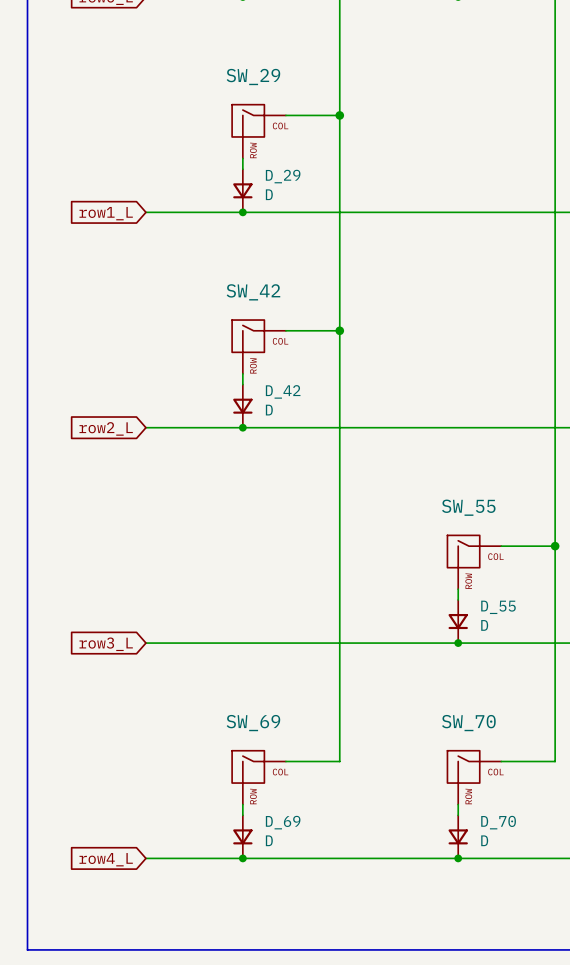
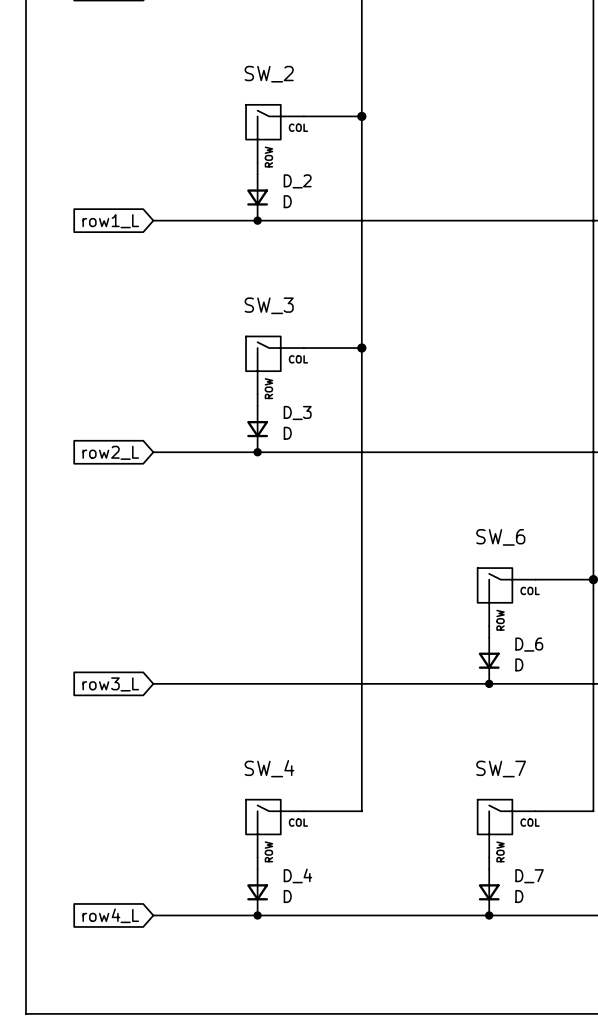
SW_29 name: SW_29 (253, 77) -> SW_2 (269, 74)
D_29 name: D_29 (283, 176) -> D_2 (297, 181)
SW_42 name: SW_42 (253, 292) -> SW_3 (269, 305)
D_42 name: D_42 (283, 391) -> D_3 (297, 413)
SW_55 name: SW_55 (468, 507) -> SW_6 (500, 537)
D_55 name: D_55 (498, 607) -> D_6 (529, 644)
SW_69 name: SW_69 (253, 723) -> SW_4 (269, 768)
SW_70 name: SW_70 (468, 723) -> SW_7 (501, 769)
D_69 name: D_69 (283, 822) -> D_4 (297, 875)
D_70 name: D_70 (498, 822) -> D_7 (529, 876)

